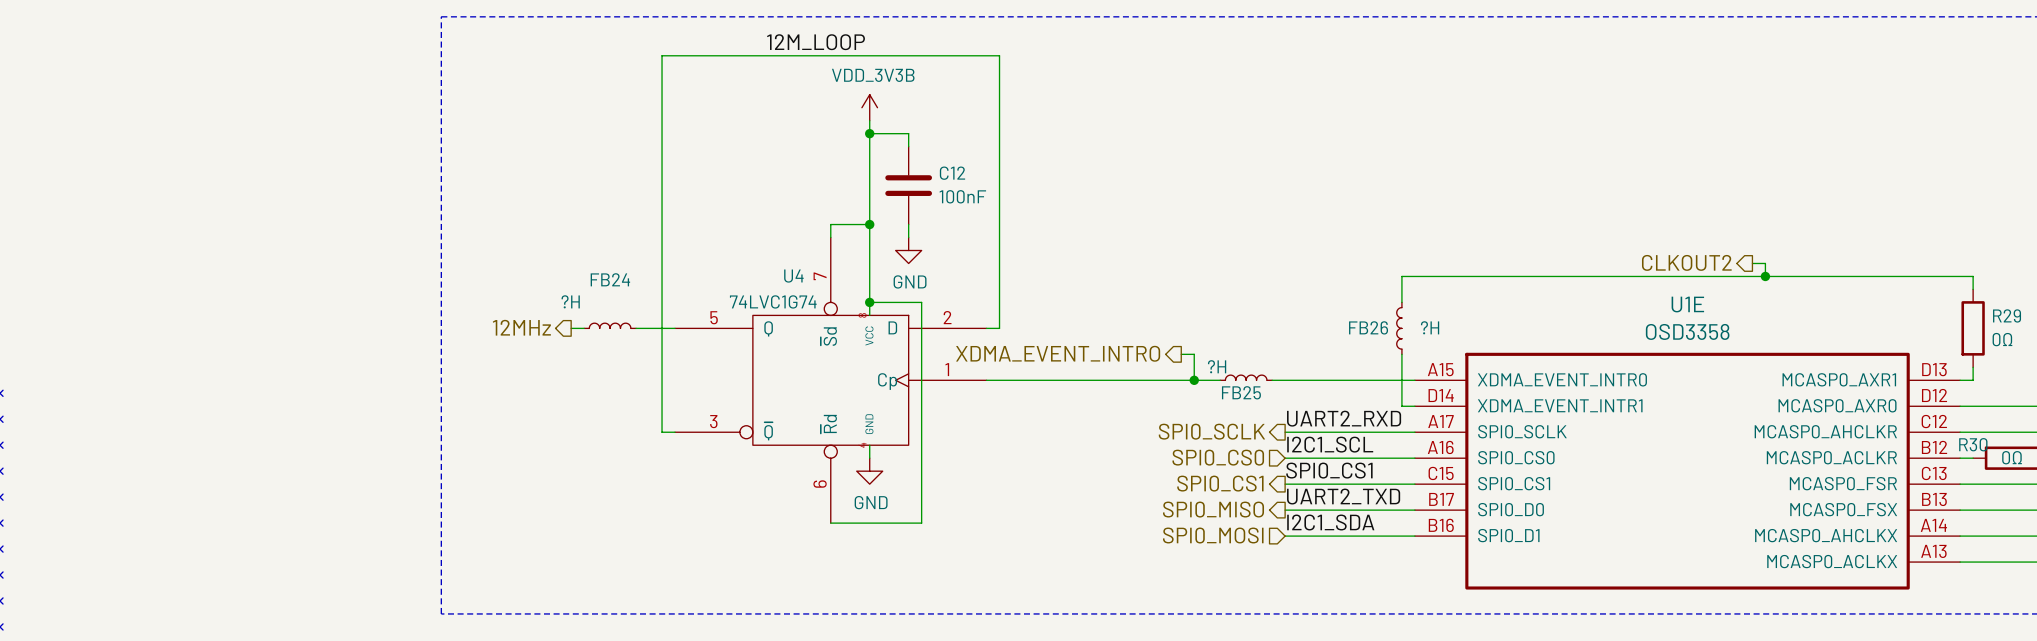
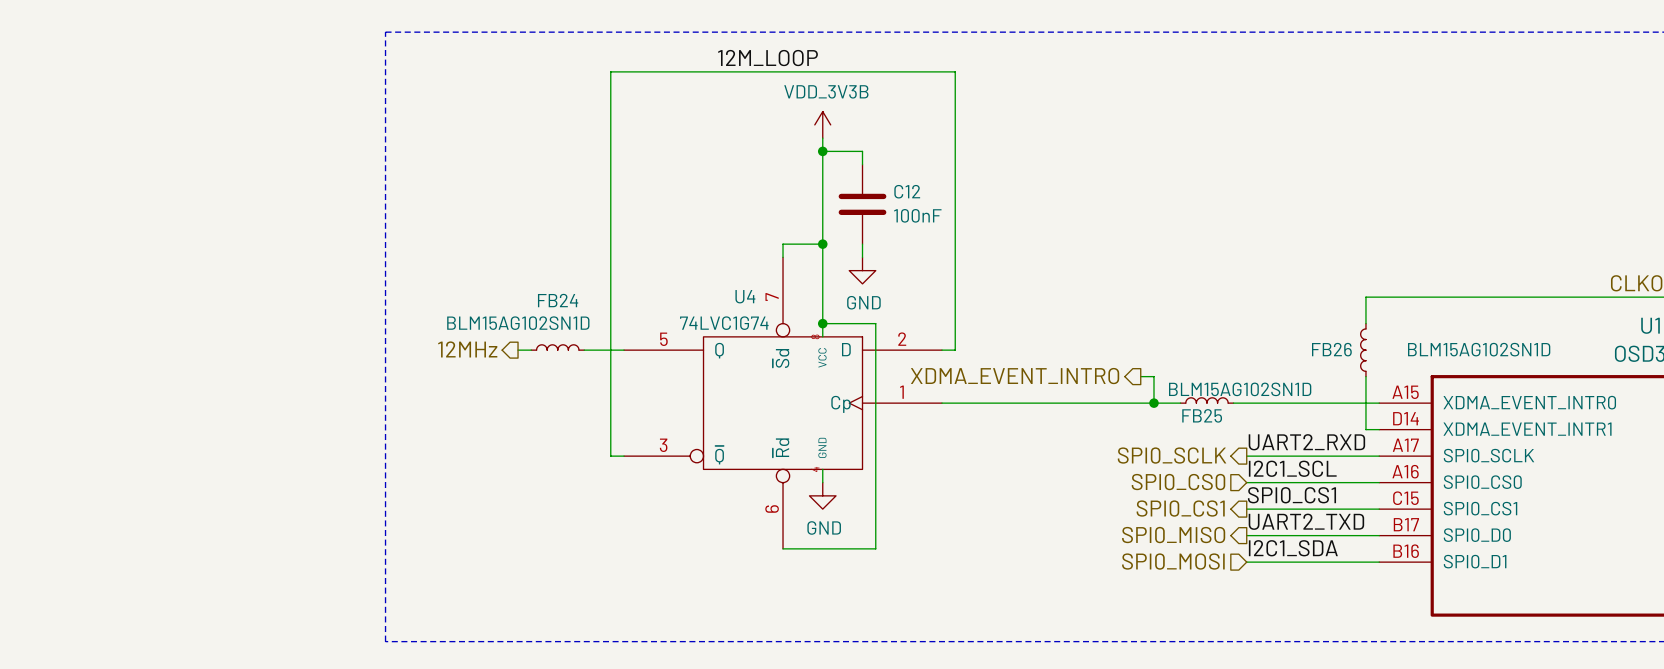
FB24 value: ?H (570, 301) -> BLM15AG102SN1D (518, 323)
FB26 value: ?H (1430, 327) -> BLM15AG102SN1D (1479, 349)
FB25 value: ?H (1217, 366) -> BLM15AG102SN1D (1240, 389)

